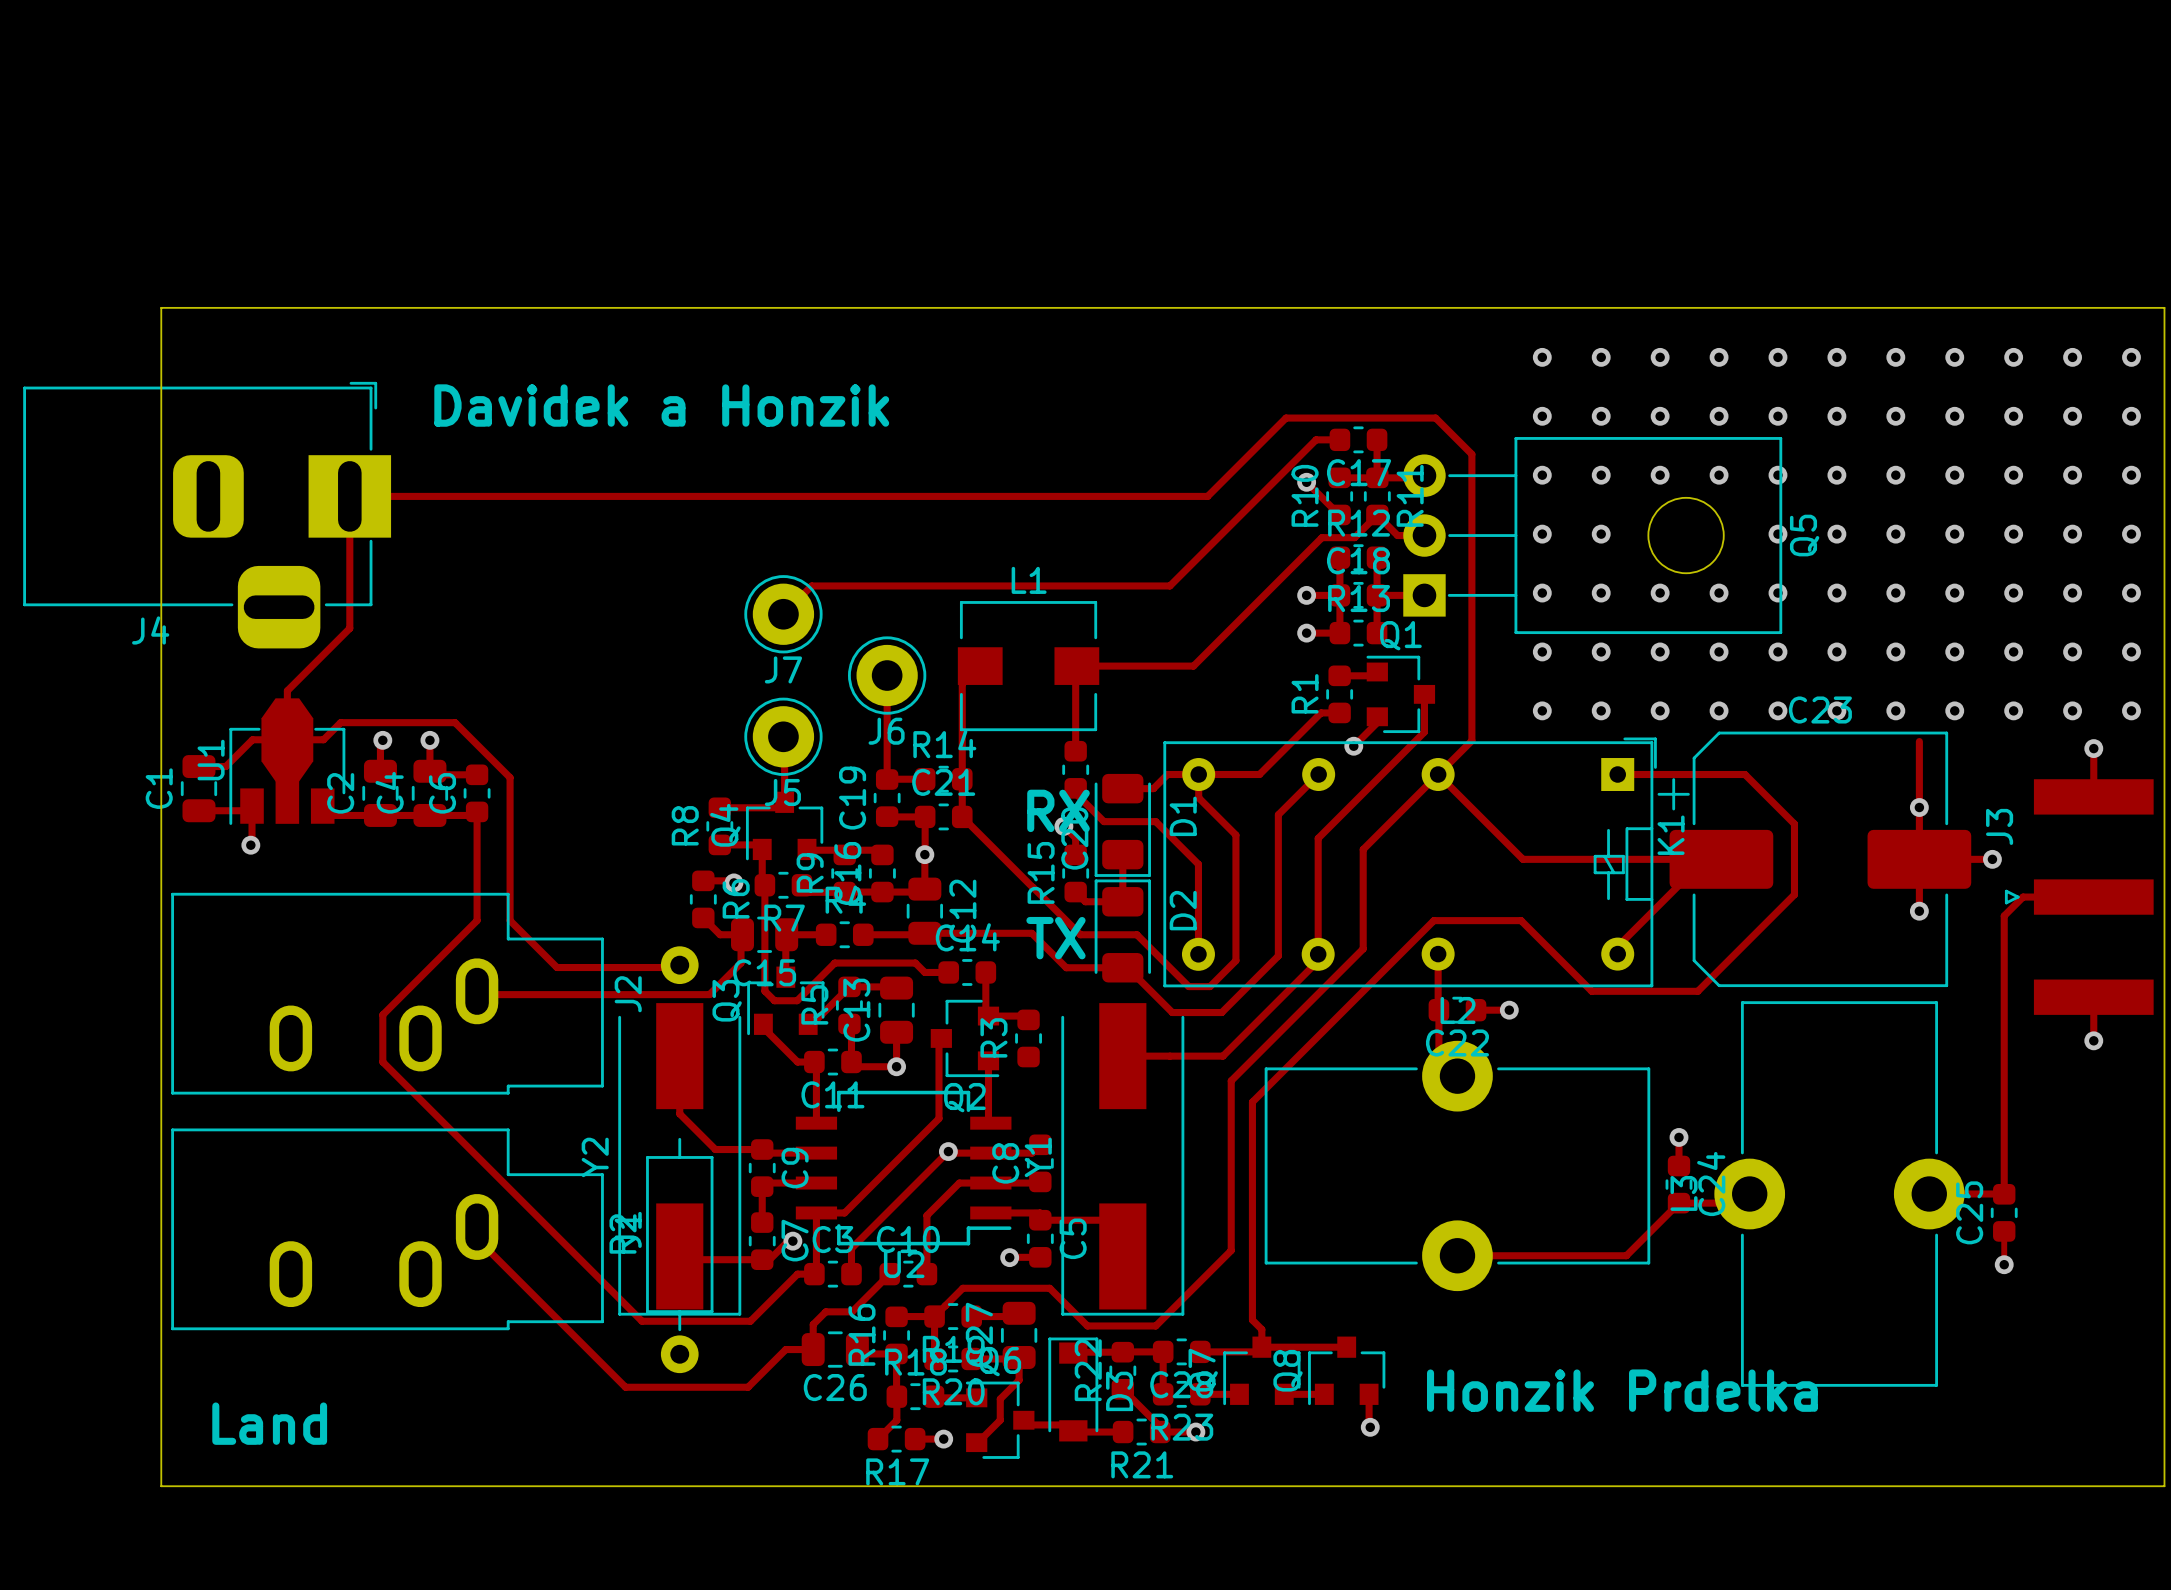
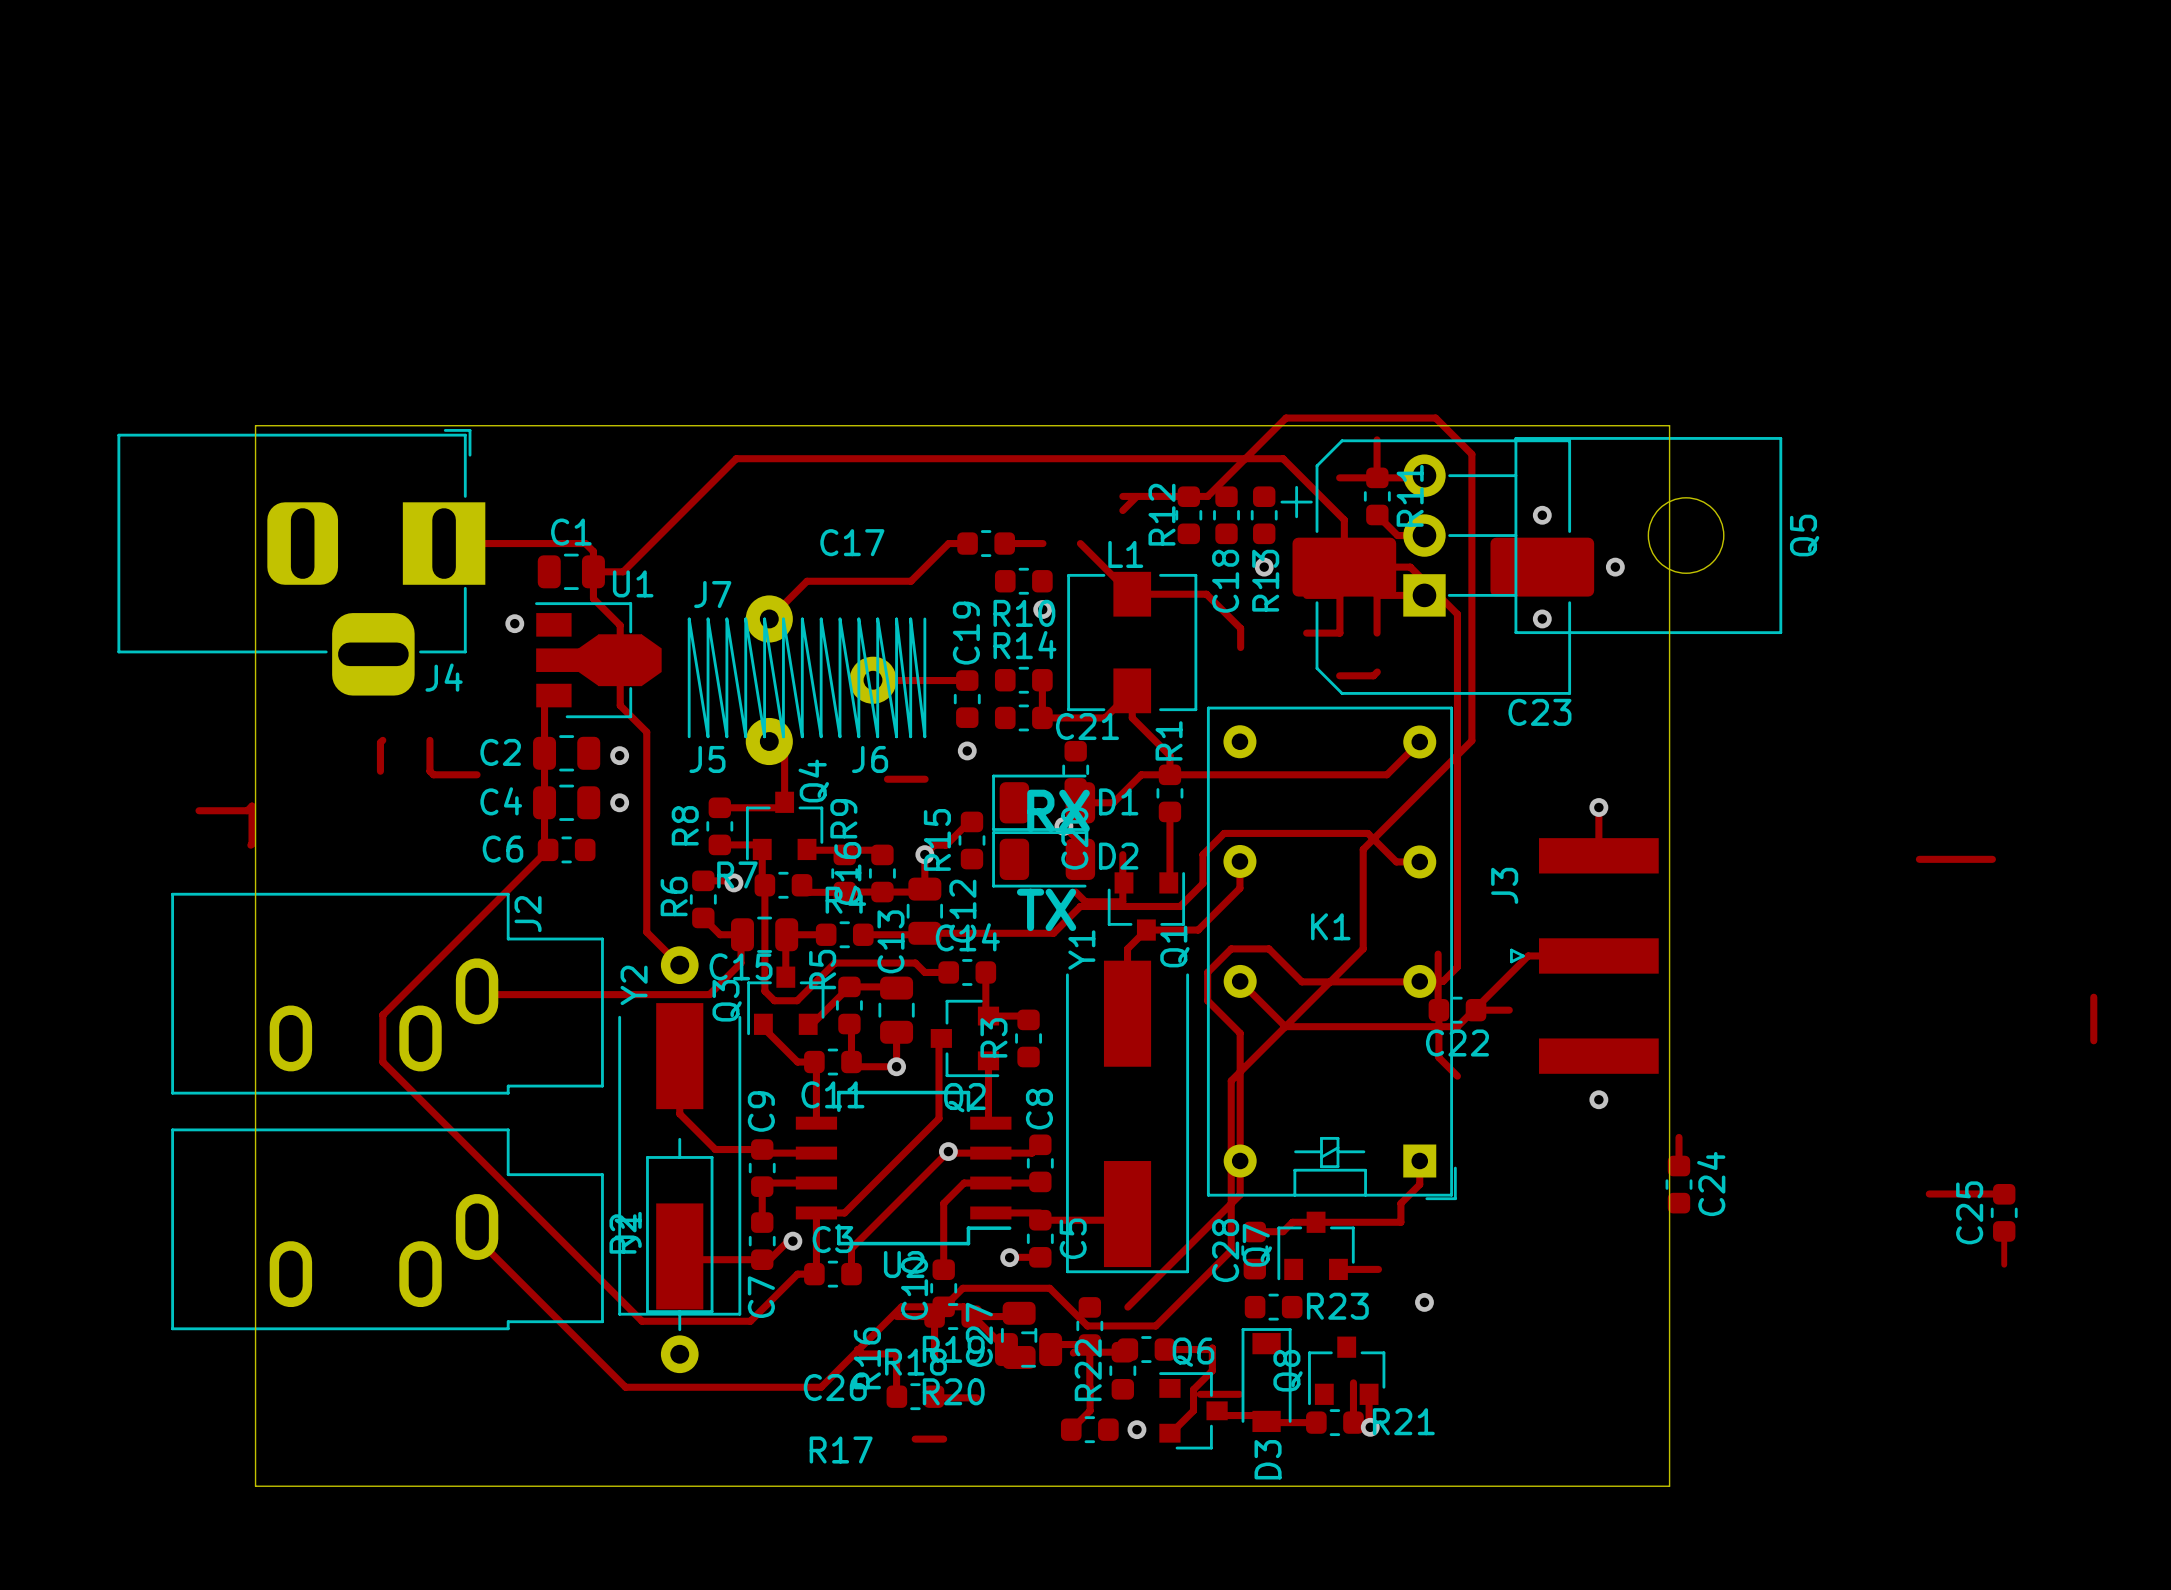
via: (1542, 357) -> none
via: (1601, 357) -> none
via: (1660, 357) -> none
via: (1719, 357) -> none
via: (1777, 357) -> none
via: (1836, 357) -> none
via: (1895, 357) -> none
via: (1954, 357) -> none
via: (2013, 357) -> none
via: (2072, 357) -> none
via: (2131, 357) -> none
text: Davidek a Honzik (661, 405) -> none
via: (1542, 416) -> none
via: (1601, 416) -> none
via: (1660, 416) -> none
via: (1719, 416) -> none
via: (1777, 416) -> none
via: (1836, 416) -> none
via: (1895, 416) -> none
via: (1954, 416) -> none
via: (2013, 416) -> none
via: (2072, 416) -> none
via: (2131, 416) -> none
track: (1339, 439) (1316, 439) (1169, 585) (811, 585) (783, 614) -> none
C17 position: (1358, 439) -> (986, 543)
C17 name position: C17 (1359, 472) -> C17 (852, 542)
via: (1542, 475) -> none
via: (1601, 475) -> none
via: (1660, 475) -> none
via: (1719, 475) -> none
via: (1777, 475) -> none
via: (1836, 475) -> none
via: (1895, 475) -> none
via: (1954, 475) -> none
via: (2013, 475) -> none
via: (2072, 475) -> none
via: (2131, 475) -> none
track: none -> (1306, 482) (1283, 458) (736, 458) (623, 571) (593, 571)
via: (1306, 482) -> none
R10 name position: R10 (1305, 495) -> R10 (1024, 613)
track: (1122, 496) (349, 496) (349, 628) (287, 690) (287, 708) -> none
track: none -> (1136, 496) (1122, 510)
R10 rotation: 0° (1339, 496) -> 90° clockwise (1023, 581)
R10 position: (1339, 496) -> (1023, 581)
track: none -> (1339, 514) (1344, 519) (1344, 567) (1410, 567) (1457, 614) (1457, 967) (1443, 981) (1301, 981) (1268, 948) (1231, 948) (1207, 972) (1207, 1000) (1240, 1033) (1240, 1194) (1127, 1307)
track: (1377, 514) (1354, 537) (1321, 537) (1193, 666) (1076, 666) (1075, 751) -> none
J4 position: (207, 515) -> (301, 562)
via position: (1542, 534) -> (1542, 515)
via: (1601, 534) -> none
via: (1777, 534) -> none
via: (1836, 534) -> none
via: (1895, 534) -> none
via: (1954, 534) -> none
via: (2013, 534) -> none
via: (2072, 534) -> none
via: (2131, 534) -> none
track: none -> (444, 543) (585, 543) (593, 551) (593, 598) (620, 625) (620, 705) (646, 732) (646, 932) (679, 965)
track: none -> (967, 543) (948, 543) (911, 581) (807, 581) (769, 618)
track: none -> (1004, 543) (1042, 543)
track: none -> (1080, 543) (1131, 594) (1206, 594) (1240, 628) (1240, 647)
R12 rotation: 0° (1358, 557) -> 90° clockwise (1188, 515)
R12 position: (1358, 557) -> (1188, 515)
C18 name position: C18 (1358, 560) -> C18 (1225, 581)
via: none -> (1264, 567)
via: none -> (1615, 567)
J7 footprint: [744, 575, 823, 654] -> [745, 595, 793, 643]
via: (1542, 593) -> none
via: (1601, 593) -> none
via: (1660, 593) -> none
via: (1719, 593) -> none
via: (1777, 593) -> none
via: (1836, 593) -> none
via: (1895, 593) -> none
via: (1954, 593) -> none
via: (2013, 593) -> none
via: (2072, 593) -> none
via: (2131, 593) -> none
via: (1306, 595) -> none
C18 rotation: 0° (1358, 595) -> 90° clockwise (1226, 515)
C18 position: (1358, 595) -> (1226, 515)
R13 name position: R13 (1359, 598) -> R13 (1265, 580)
via: none -> (1042, 609)
line: none -> (924, 618) (924, 736) (910, 618) (910, 736) (896, 618) (896, 736) (877, 618) (877, 736) (858, 618) (858, 736) (840, 618) (840, 736) (821, 618) (821, 736) (802, 618) (802, 736) (783, 618) (783, 736) (764, 618) (764, 736) (745, 618) (745, 736) (726, 618) (726, 736) (708, 618) (708, 736) (689, 618) (689, 736)
via: none -> (1542, 618)
via: none -> (514, 623)
J4 name position: J4 (150, 630) -> J4 (444, 677)
via: (1306, 633) -> none
R13 rotation: 0° (1358, 633) -> 90° clockwise (1264, 515)
R13 position: (1358, 633) -> (1264, 515)
Q1 name position: Q1 (1400, 635) -> Q1 (1174, 946)
J6 footprint: [848, 636, 927, 715] -> [849, 656, 897, 704]
via: (1542, 651) -> none
via: (1601, 651) -> none
via: (1660, 651) -> none
via: (1719, 651) -> none
via: (1777, 651) -> none
via: (1836, 651) -> none
via: (1895, 651) -> none
via: (1954, 651) -> none
via: (2013, 651) -> none
via: (2072, 651) -> none
via: (2131, 651) -> none
track: (980, 666) (962, 684) (962, 816) (1032, 887) -> none
L1 rotation: 0° (1028, 666) -> 90° clockwise (1132, 642)
L1 position: (1028, 666) -> (1132, 642)
J7 name position: J7 (783, 669) -> J7 (712, 594)
track: (887, 675) (887, 779) -> none
track: none -> (873, 680) (967, 680)
track: none -> (1042, 680) (1042, 717) (1105, 717) (1132, 690) (1132, 717) (1169, 755) (1169, 774)
R1 name position: R1 (1305, 693) -> R1 (1169, 740)
R1 position: (1339, 694) -> (1169, 793)
Q1 rotation: 0° (1400, 694) -> 90° clockwise (1146, 906)
Q1 position: (1400, 694) -> (1146, 906)
track: (1424, 694) (1424, 732) (1318, 838) (1318, 960) (1222, 1056) (1122, 1056) -> none
J5 footprint: [744, 697, 823, 776] -> [745, 717, 793, 766]
C23 name position: C23 (1820, 709) -> C23 (1539, 712)
via: (1542, 710) -> none
via: (1601, 710) -> none
via: (1660, 710) -> none
via: (1719, 710) -> none
via: (1777, 710) -> none
via: (1836, 710) -> none
via: (1895, 710) -> none
via: (1954, 710) -> none
via: (2013, 710) -> none
via: (2072, 710) -> none
via: (2131, 710) -> none
track: (1339, 712) (1321, 712) (1259, 774) (1167, 774) (1153, 788) (1122, 788) -> none
track: (1377, 716) (1377, 722) (1353, 746) -> none
via: (382, 740) -> none
via: (429, 740) -> none
track: none -> (1419, 741) (1386, 774) (1141, 774) (1113, 802) (1080, 802)
track: (1919, 741) (1919, 911) -> none
via: (1353, 746) -> none
track: (2093, 748) (2093, 796) -> (1598, 807) (1598, 855)
via: (2093, 748) -> none
via: none -> (967, 750)
via: none -> (619, 755)
U1 rotation: 0° (287, 761) -> 90° clockwise (598, 660)
U1 position: (287, 761) -> (598, 660)
track: (198, 766) (225, 766) (252, 739) (323, 739) (340, 722) (455, 722) (510, 777) (510, 920) (556, 967) (679, 967) -> none
track: (1198, 774) (1198, 797) (1235, 835) (1235, 960) (1210, 986) (1188, 986) (1136, 934) (1080, 934) (1032, 887) -> none
track: (1318, 774) (1278, 814) (1278, 955) (1221, 1012) (1172, 1012) (1127, 967) (1066, 967) (1031, 933) -> (1419, 861) (1396, 861) (1367, 833) (1224, 833) (1202, 854) (1202, 883) (1180, 906) (1080, 906) (1053, 933) (1031, 933)
track: (1438, 774) (1522, 859) (1721, 859) -> none
track: (1617, 774) (1744, 774) (1794, 823) (1794, 894) (1697, 991) (1591, 991) (1521, 920) (1433, 920) (1252, 1102) (1252, 1320) (1261, 1329) (1261, 1347) -> none
R14 position: (943, 779) -> (1023, 680)
C21 name position: C21 (943, 782) -> C21 (1087, 726)
C1 rotation: 0° (198, 788) -> 90° clockwise (571, 571)
C1 position: (198, 788) -> (571, 571)
track: (1075, 788) (1075, 793) (1103, 821) (1155, 821) (1198, 864) (1198, 954) -> none
J5 name position: J5 (782, 792) -> J5 (707, 759)
C2 rotation: 0° (380, 793) -> 90° clockwise (566, 753)
C2 position: (380, 793) -> (566, 753)
C4 rotation: 0° (429, 793) -> 90° clockwise (566, 802)
C4 position: (429, 793) -> (566, 802)
C6 rotation: 0° (477, 793) -> 90° clockwise (566, 849)
C6 position: (477, 793) -> (566, 849)
C19 name position: C19 (852, 798) -> C19 (966, 633)
C19 position: (887, 798) -> (967, 699)
via: none -> (619, 802)
track: (322, 806) (332, 815) (473, 815) (477, 811) (477, 920) (382, 1014) -> (553, 695) (544, 704) (544, 846) (548, 849) (383, 1014)
via: none -> (1598, 807)
via: (1919, 807) -> none
track: none -> (1169, 811) (1168, 882)
track: (887, 816) (925, 816) (925, 854) -> (971, 821) (969, 821) (946, 845) (934, 845) (925, 854)
C21 position: (943, 816) -> (1023, 717)
Q4 name position: Q4 (725, 825) -> Q4 (813, 781)
D1 rotation: 0° (1122, 825) -> 90° clockwise (1043, 802)
D1 position: (1122, 825) -> (1043, 802)
K1 name position: K1 (1671, 835) -> K1 (1330, 926)
via: (250, 845) -> none
track: (1704, 859) (1617, 946) (1617, 954) -> none
C23 position: (1814, 859) -> (1437, 567)
via: (1992, 859) -> none
track: none -> (1239, 861) (1239, 888) (1198, 930) (1146, 930) (1127, 948) (1127, 1013)
K1 rotation: 0° (1410, 862) -> 90° clockwise (1331, 953)
R9 name position: R9 (810, 872) -> R9 (843, 818)
R15 position: (1075, 873) -> (971, 840)
J3 position: (2079, 897) -> (1584, 955)
track: (2093, 897) (2023, 897) (2004, 915) (2004, 1194) -> none
R6 name position: R6 (736, 898) -> R6 (674, 896)
via: (1919, 911) -> none
R7 name position: R7 (784, 918) -> R7 (737, 874)
D2 rotation: 0° (1122, 930) -> 90° counterclockwise (1043, 859)
D2 position: (1122, 930) -> (1043, 859)
text position: TX (1055, 938) -> TX (1046, 909)
track: none -> (1598, 955) (1528, 955) (1457, 1026) (1285, 1026) (1240, 981)
C15 name position: C15 (764, 972) -> C15 (741, 966)
J2 name position: J2 (628, 994) -> J2 (528, 914)
R5 name position: R5 (814, 1004) -> R5 (822, 969)
C13 name position: C13 (856, 1010) -> C13 (890, 941)
via: (1509, 1010) -> none
via: (2093, 1040) -> none
via: none -> (1598, 1099)
via: (1679, 1137) -> none
Y2 name position: Y2 (595, 1157) -> Y2 (634, 985)
Y1 name position: Y1 (1038, 1157) -> Y1 (1081, 950)
Y1 position: (1122, 1159) -> (1127, 1116)
track: none -> (1419, 1161) (1419, 1184) (1400, 1203) (1400, 1222) (1292, 1222) (1283, 1231) (1255, 1231)
C8 name position: C8 (1005, 1163) -> C8 (1039, 1109)
L2: (1457, 1165) -> none
C9 name position: C9 (795, 1168) -> C9 (761, 1111)
track: (964, 1183) (959, 1183) (926, 1215) (926, 1274) -> (964, 1183) (943, 1203) (943, 1269)
track: (1749, 1194) (1740, 1203) (1679, 1203) (1626, 1255) (1457, 1255) -> none
L3: (1839, 1194) -> none
C7 name position: C7 (795, 1240) -> C7 (761, 1297)
via: (2004, 1264) -> none
track: (889, 1274) (852, 1311) (825, 1311) (813, 1324) (813, 1349) -> none
C10 rotation: 0° (908, 1274) -> 90° clockwise (943, 1288)
C10 position: (908, 1274) -> (943, 1288)
via: none -> (1424, 1302)
R16 name position: R16 (861, 1334) -> R16 (867, 1358)
R16 position: (896, 1335) -> (1089, 1325)
track: (1261, 1347) (1346, 1347) -> none
track: (1261, 1347) (1257, 1351) (1200, 1351) -> none
track: (813, 1349) (785, 1349) (748, 1387) -> (1006, 1349) (963, 1306) (901, 1306) (821, 1387) (748, 1387)
C26 position: (835, 1349) -> (1028, 1349)
track: none -> (1050, 1349) (1055, 1344) (1089, 1344) (1089, 1386)
track: (1123, 1351) (1163, 1351) (1163, 1394) -> none
C28 rotation: 0° (1181, 1351) -> 90° clockwise (1254, 1250)
C28 position: (1181, 1351) -> (1254, 1250)
R20 position: (953, 1358) -> (1146, 1349)
track: (971, 1358) (1019, 1357) (1019, 1380) (1000, 1399) (1000, 1420) (977, 1442) (971, 1442) -> (1164, 1349) (1212, 1348) (1212, 1370) (1193, 1389) (1193, 1410) (1171, 1433) (1165, 1433)
Q7 position: (1261, 1370) -> (1316, 1245)
track: none -> (1353, 1382) (1353, 1422)
D3 position: (1073, 1389) -> (1266, 1380)
track: (1122, 1389) (1160, 1426) (1160, 1432) (1195, 1432) -> none
text: Honzik Prdelka (1622, 1390) -> none
D3 name position: D3 (1119, 1391) -> D3 (1268, 1459)
R23 position: (1181, 1394) -> (1273, 1307)
track: (1284, 1394) (1324, 1394) -> (1338, 1269) (1378, 1269)
track: (896, 1396) (896, 1420) (878, 1439) -> (1090, 1387) (1090, 1410) (1071, 1429)
Q6 position: (1000, 1420) -> (1193, 1410)
track: (1023, 1420) (1028, 1424) (1067, 1424) (1074, 1432) (1123, 1432) -> (1217, 1410) (1221, 1415) (1260, 1415) (1267, 1422) (1316, 1422)
text: Land (269, 1423) -> none
R23 name position: R23 (1182, 1427) -> R23 (1337, 1306)
R21 position: (1141, 1432) -> (1334, 1422)
via position: (1195, 1432) -> (1136, 1429)
R17 position: (896, 1439) -> (1089, 1429)
via: (943, 1439) -> none
R21 name position: R21 (1142, 1464) -> R21 (1403, 1421)
R17 name position: R17 (897, 1471) -> R17 (841, 1450)
board edge: (255, 1486) (161, 1486) (161, 307) (2164, 307) (2164, 1486) (1669, 1486) -> (255, 1486) (255, 425) (1669, 425) (1669, 1486)

